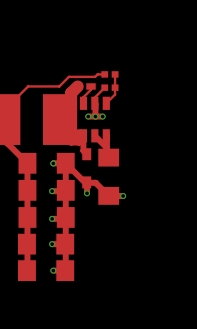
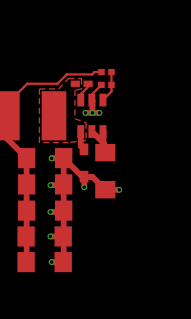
top zone outline: none -> (81, 78) (68, 78) (58, 88) (39, 88) (39, 142) (86, 140) (86, 122) (74, 118) (74, 90) (81, 88) (81, 78)
top track: (77, 86) (71, 93) (71, 139) (79, 139) (79, 135) -> none

